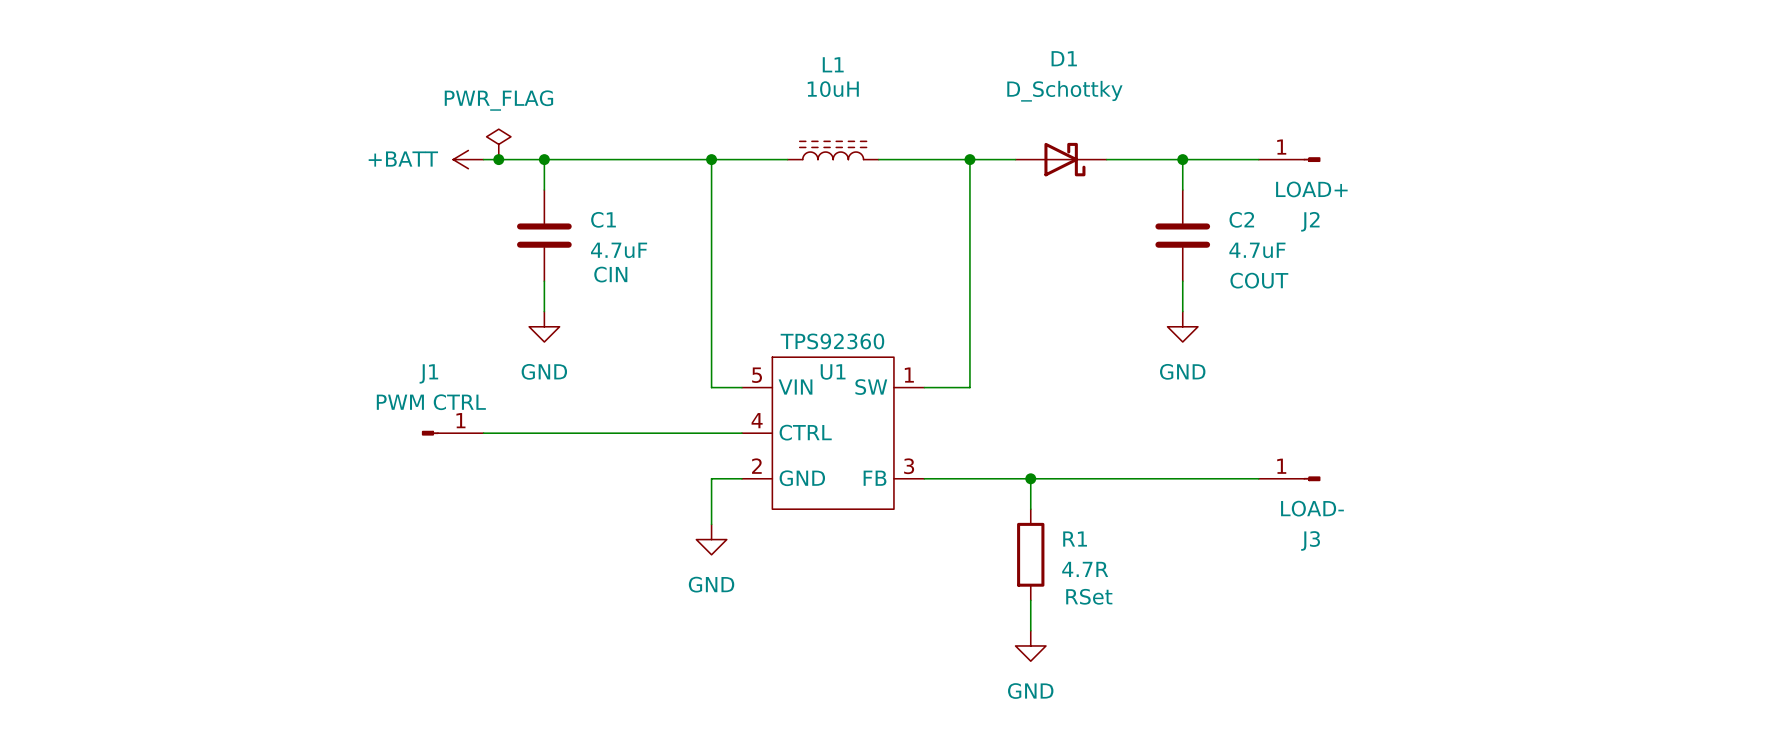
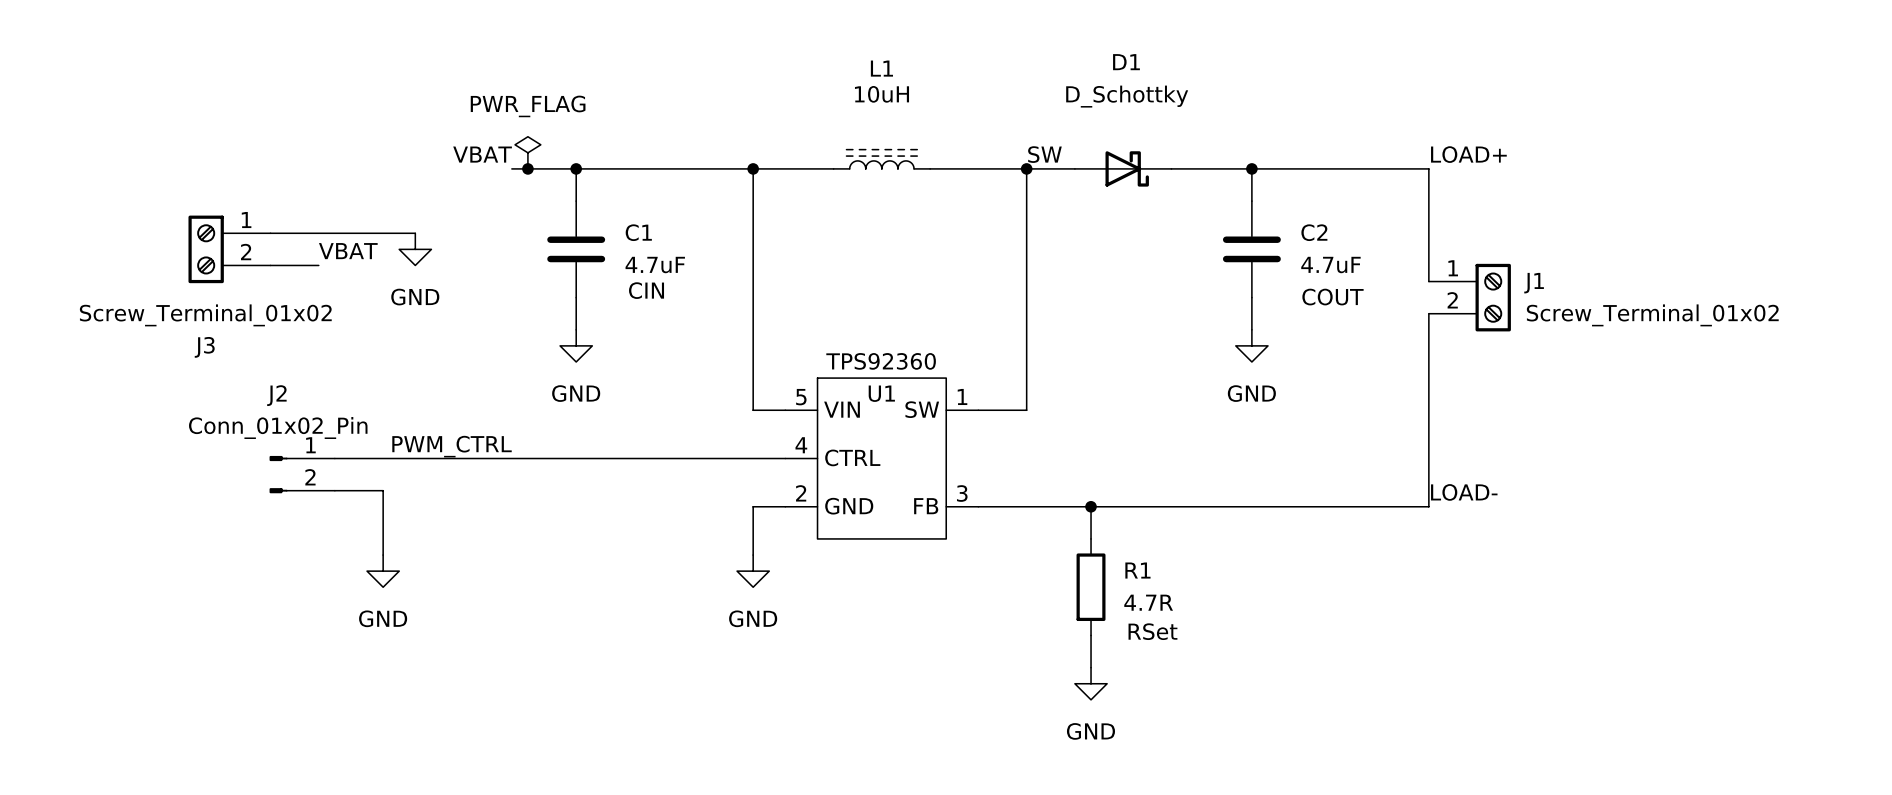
label: none -> VBAT (482, 154)
label: none -> SW (1044, 154)
label: none -> LOAD+ (1468, 154)
J2 symbol: [1258, 157, 1321, 163] -> [269, 455, 335, 494]
power symbol: +BATT (468, 159) -> none
wire: none -> (1332, 168) (1428, 168) (1428, 281)
J2 value: LOAD+ (1311, 189) -> Conn_01x02_Pin (278, 428)
wire: none -> (270, 233) (415, 233)
J2 name position: J2 (1310, 221) -> J2 (276, 395)
power symbol: none -> GND (415, 249)
label: none -> VBAT (348, 251)
wire: none -> (270, 265) (318, 265)
wire: none -> (1428, 313) (1428, 506) (1332, 506)
J1 name position: J1 (428, 373) -> J1 (1534, 283)
J1 value: PWM CTRL (431, 402) -> Screw_Terminal_01x02 (1652, 315)
label: none -> PWM_CTRL (452, 446)
J1 symbol: [421, 430, 484, 436] -> [1428, 263, 1511, 332]
wire: none -> (334, 458) (511, 458)
wire: none -> (334, 490) (383, 490) (383, 555)
label: none -> LOAD- (1464, 492)
J3 symbol: [1258, 476, 1321, 482] -> [188, 215, 271, 284]
J3 value: LOAD- (1312, 508) -> Screw_Terminal_01x02 (205, 315)
power symbol: none -> GND (383, 571)
J3 name position: J3 (1310, 540) -> J3 (204, 347)

